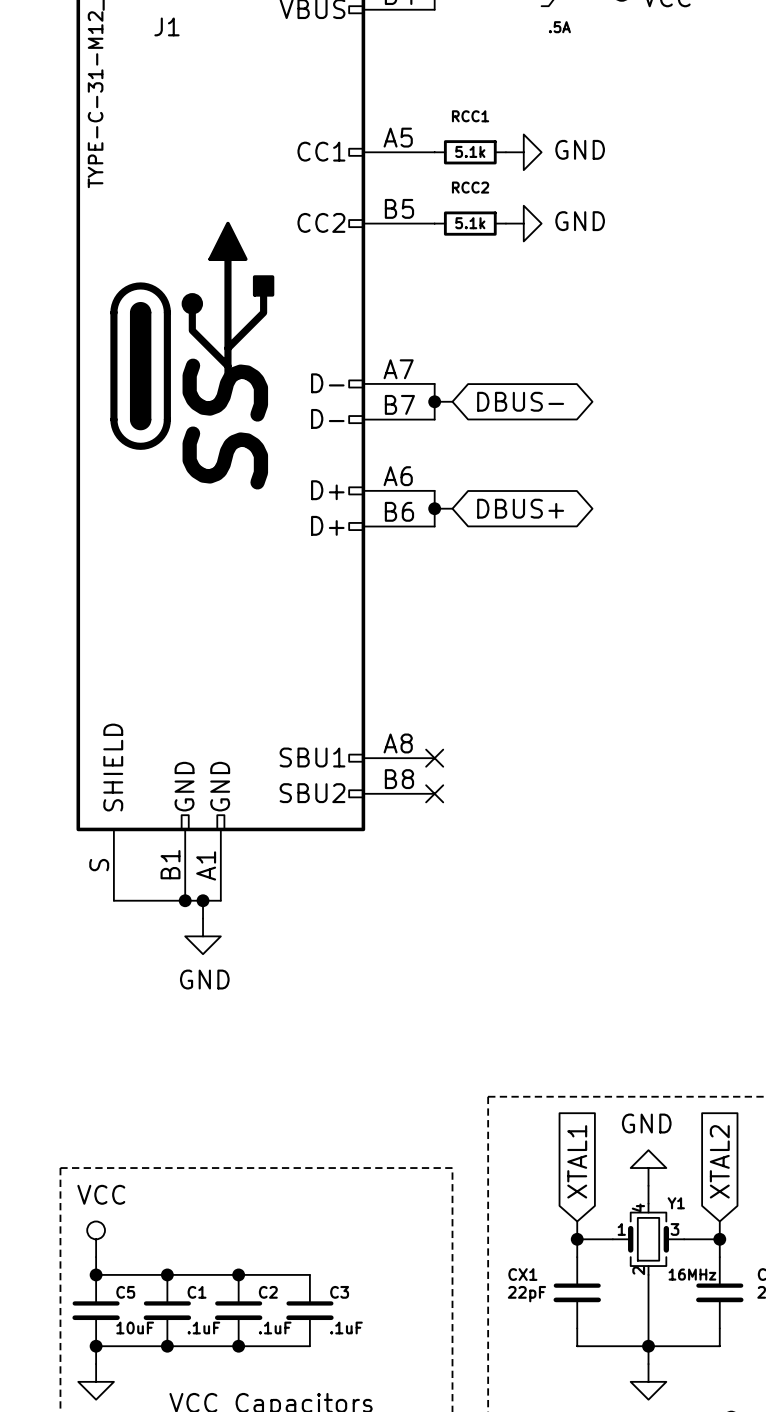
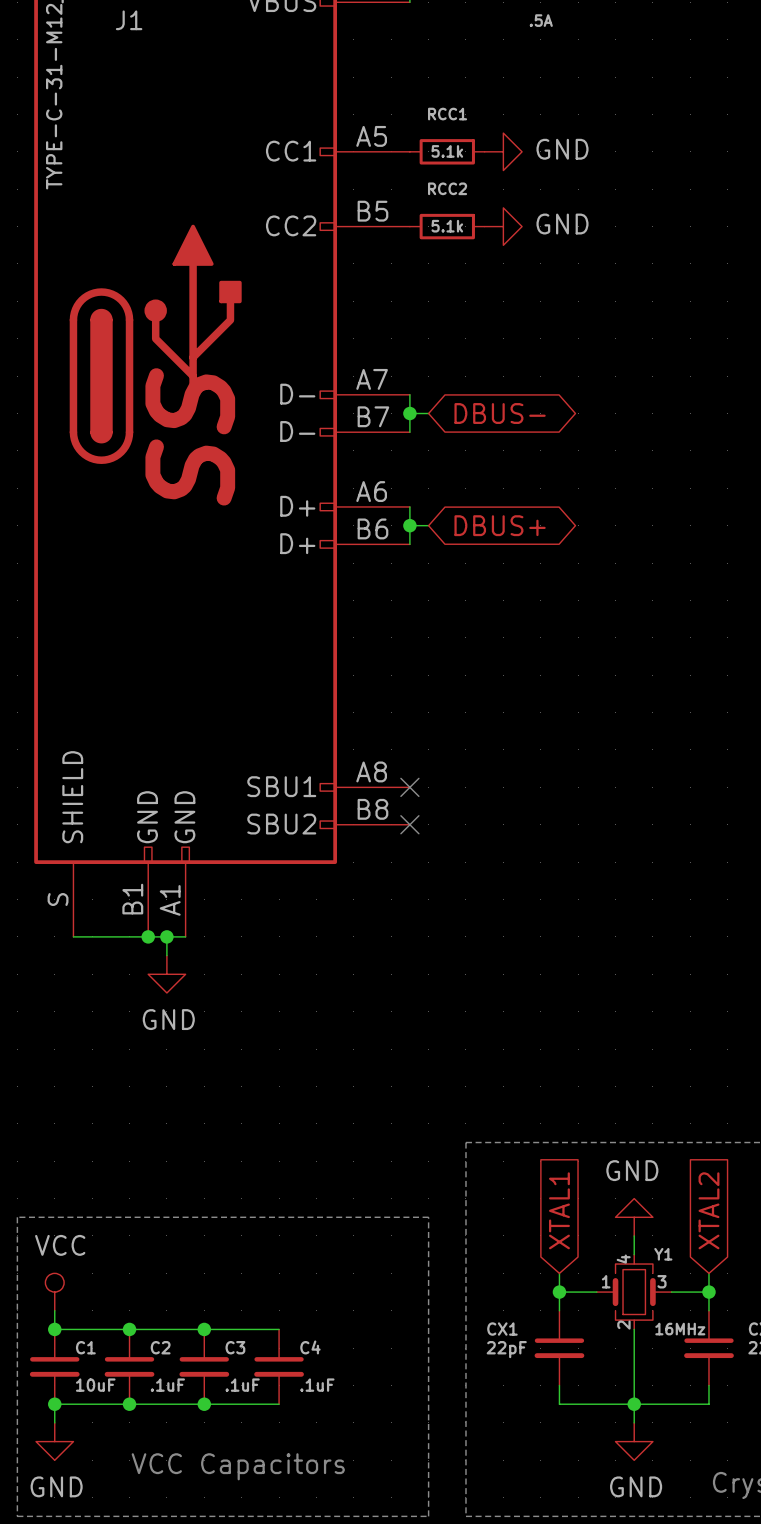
C5 name: C5 (125, 1292) -> C1 (85, 1347)
C1 name: C1 (197, 1292) -> C2 (160, 1347)
C2 name: C2 (268, 1292) -> C3 (235, 1347)
C3 name: C3 (339, 1292) -> C4 (310, 1347)

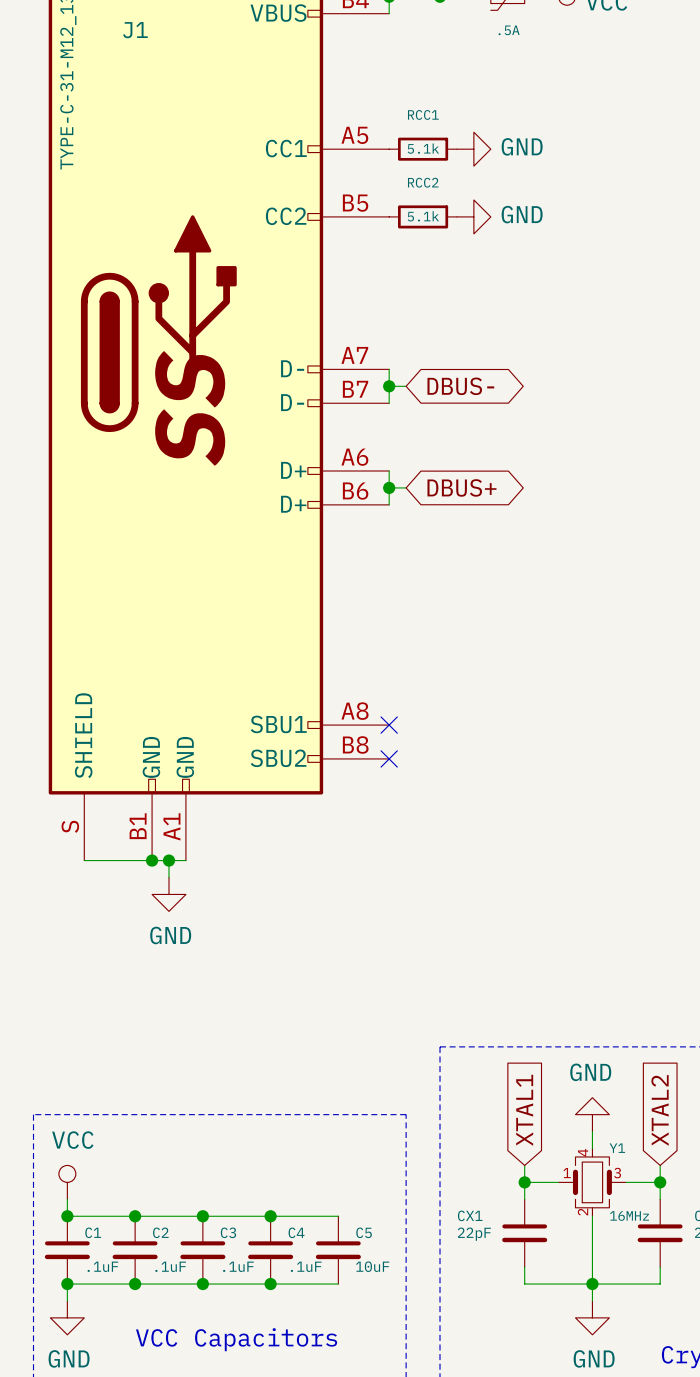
wire: none -> (270, 1216) (338, 1216)
junction: none -> (270, 1216)
C5: none -> 10uF (338, 1250)
C1 value: 10uF (95, 1385) -> .1uF (102, 1266)
wire: none -> (270, 1284) (338, 1284)
junction: none -> (270, 1284)

